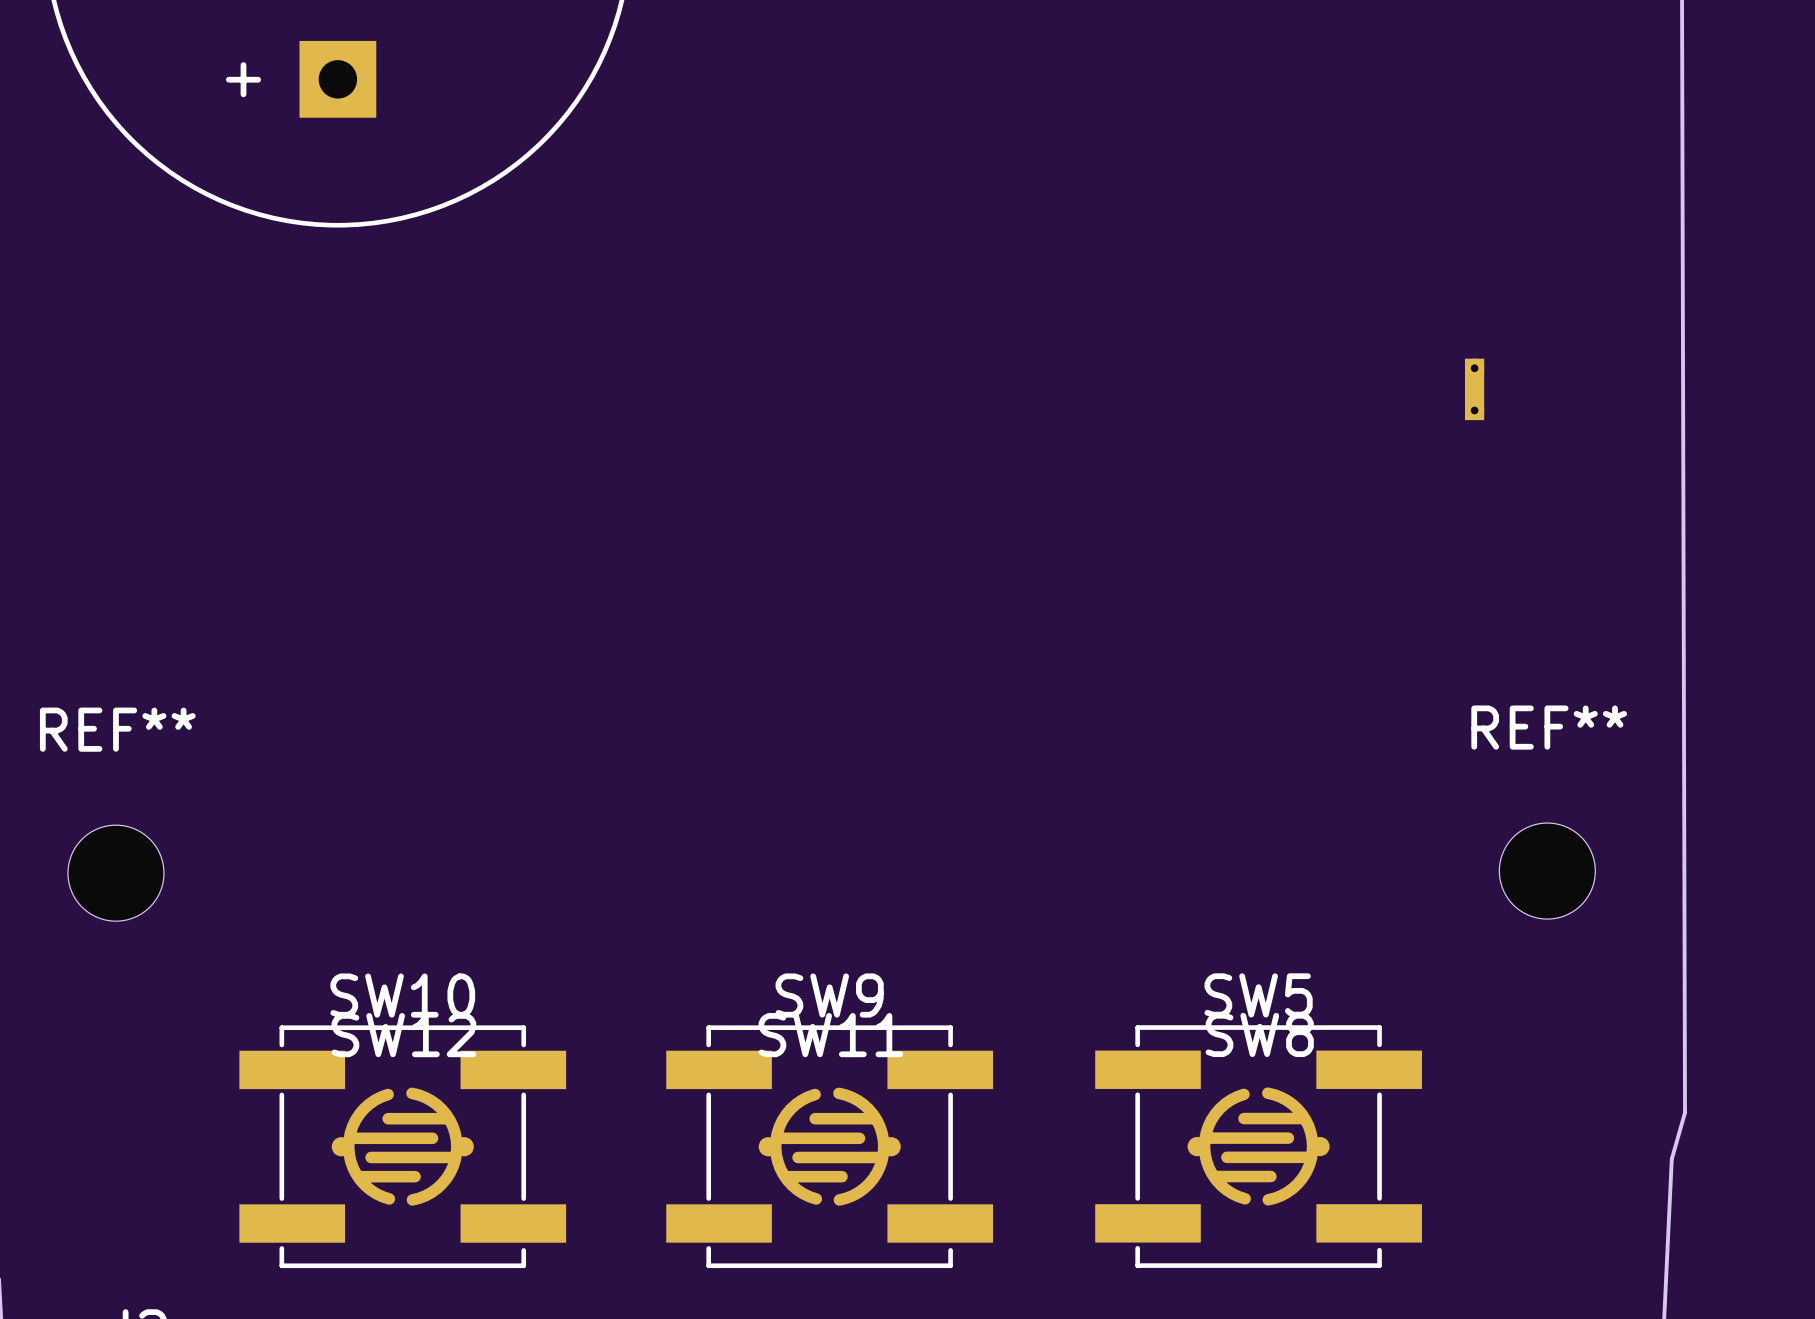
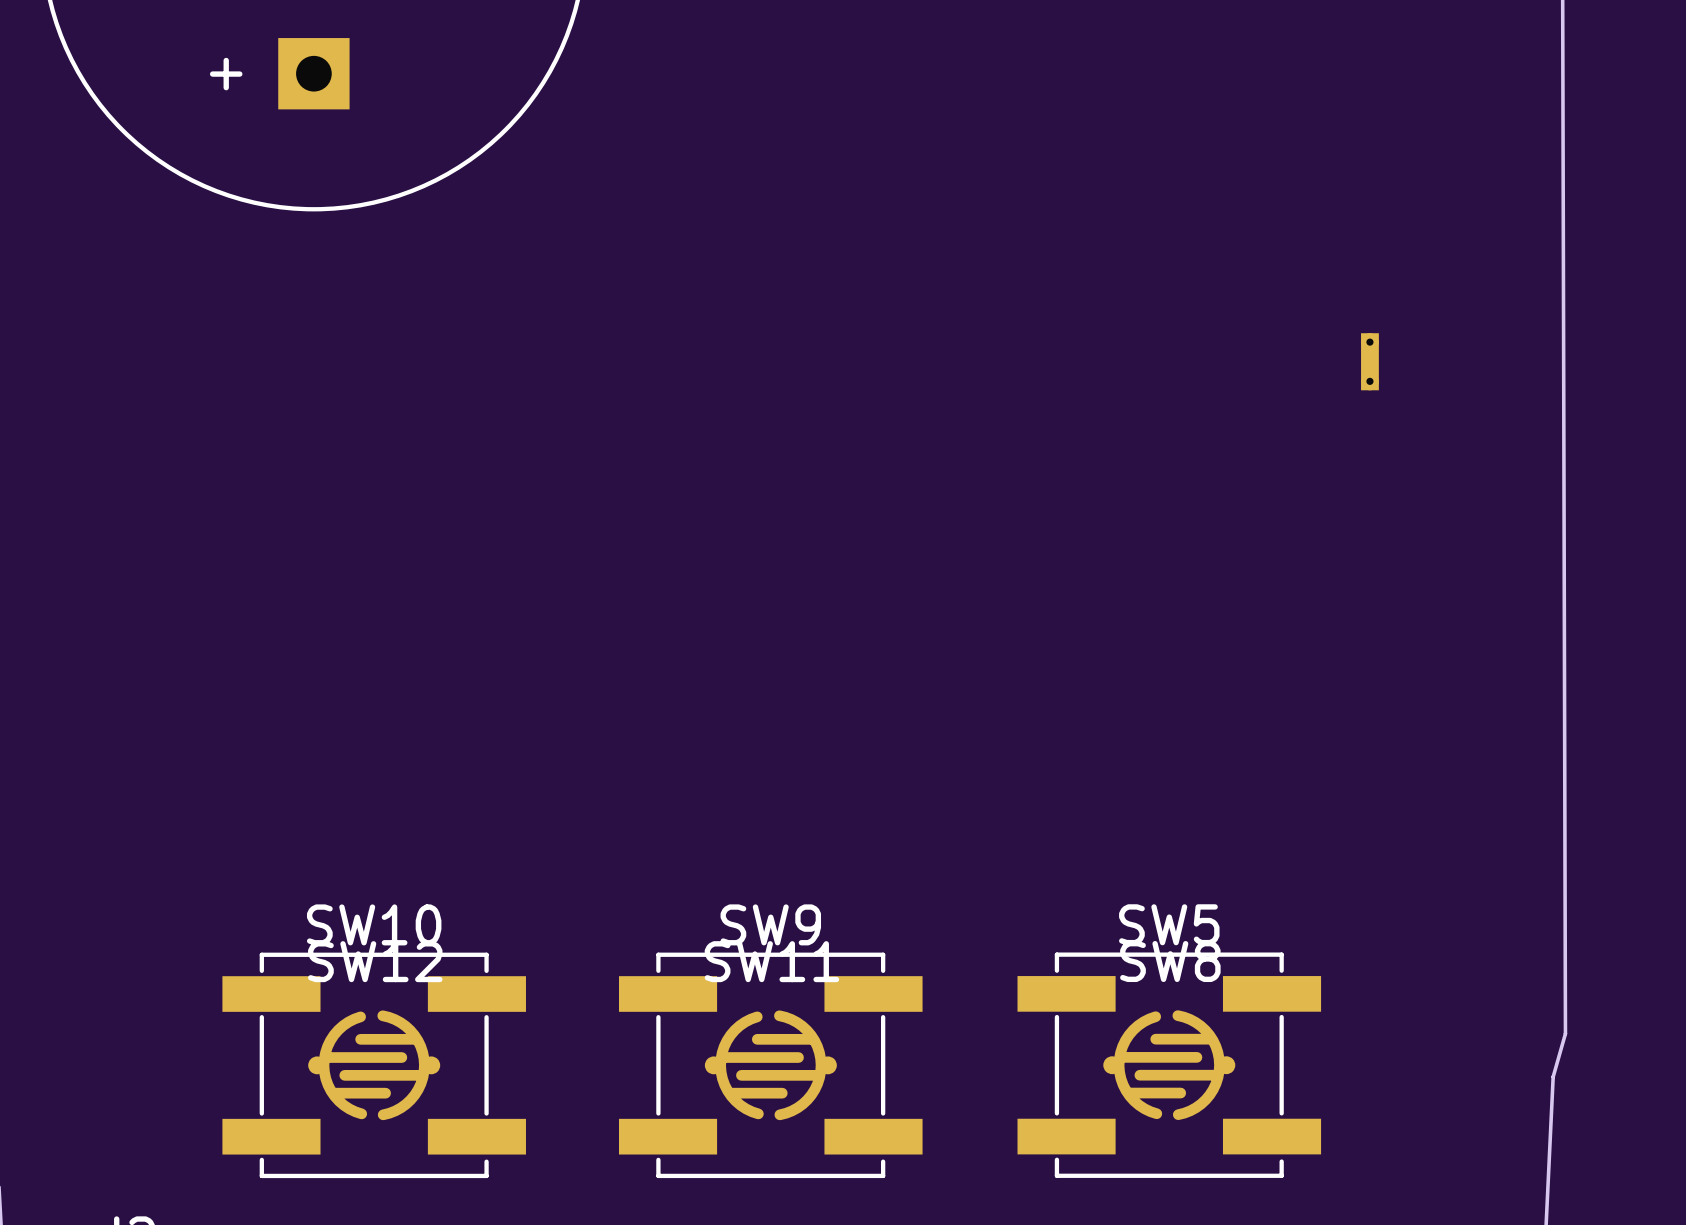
REF**: (1547, 871) -> none
REF**: (115, 873) -> none

